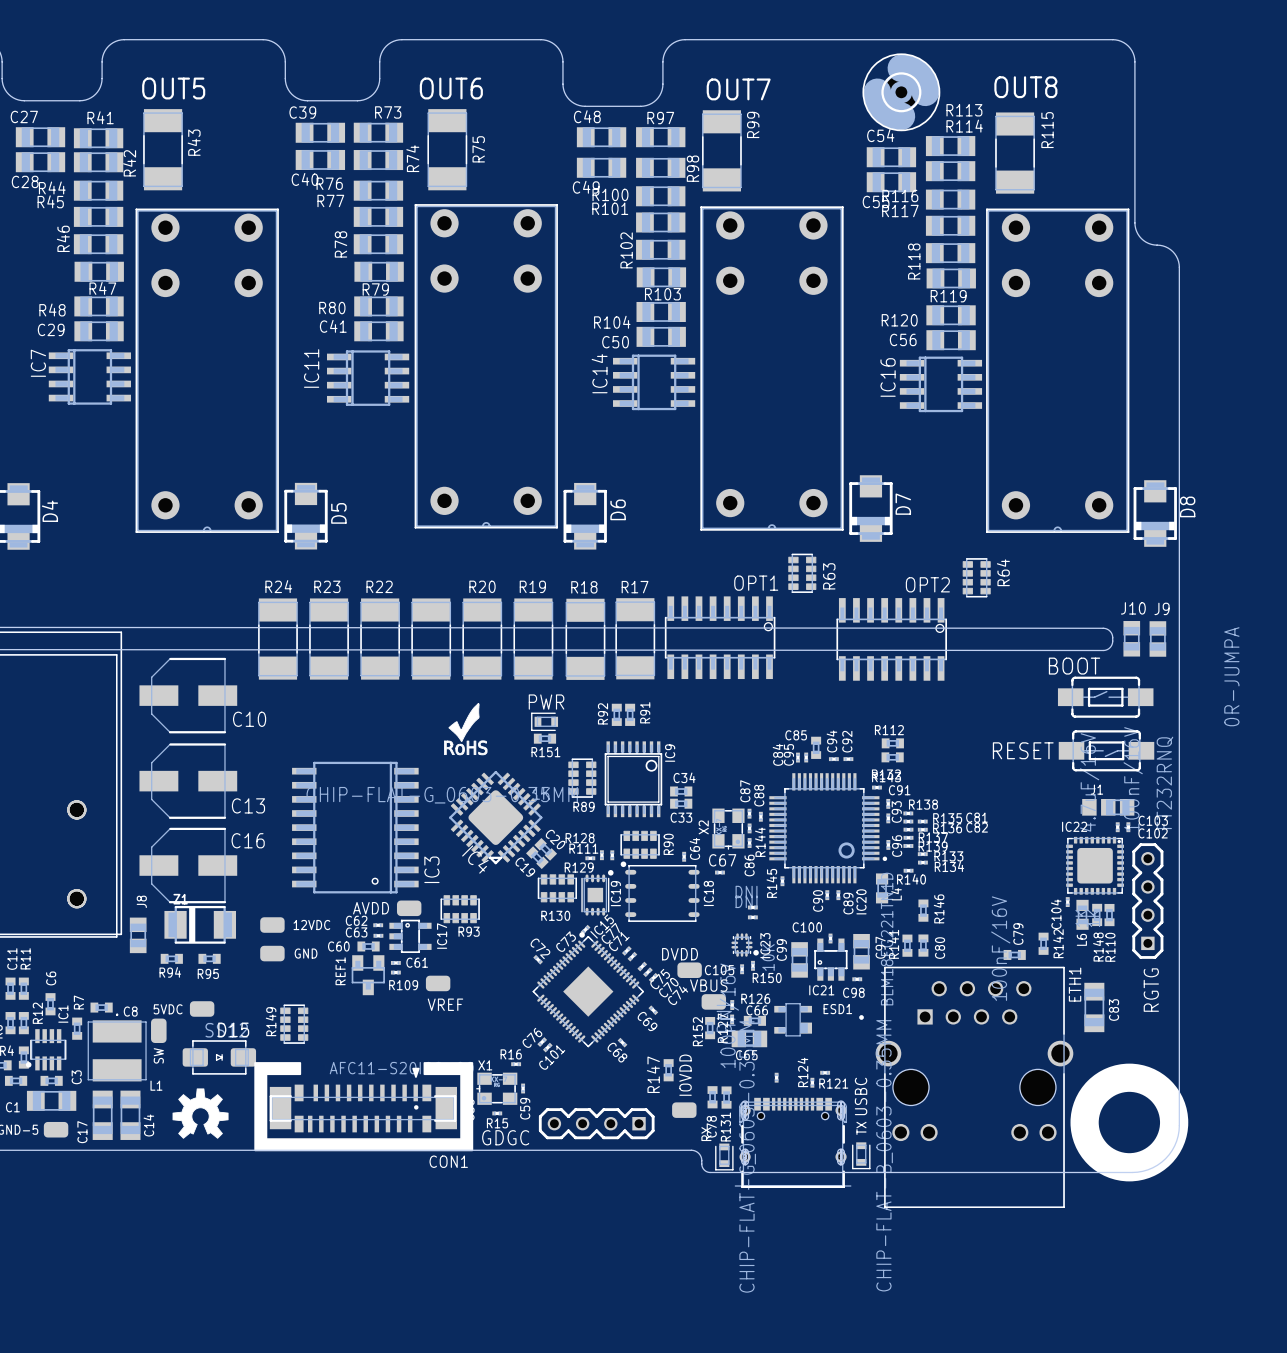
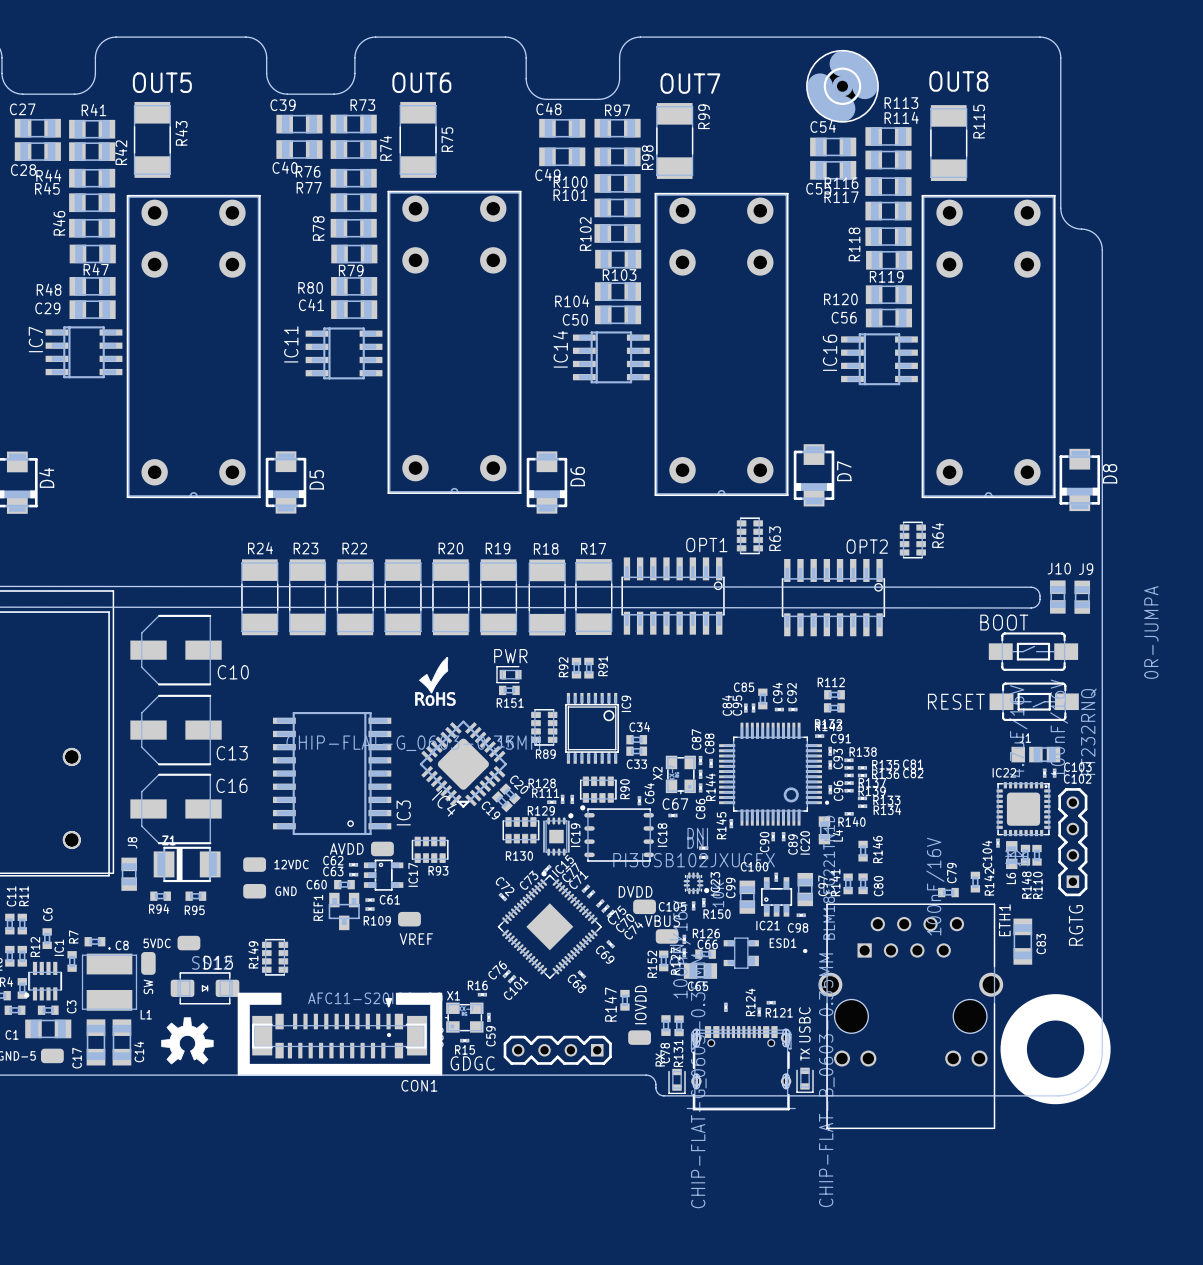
IC23 value: none -> PI3USB102JXUCEX (694, 860)

